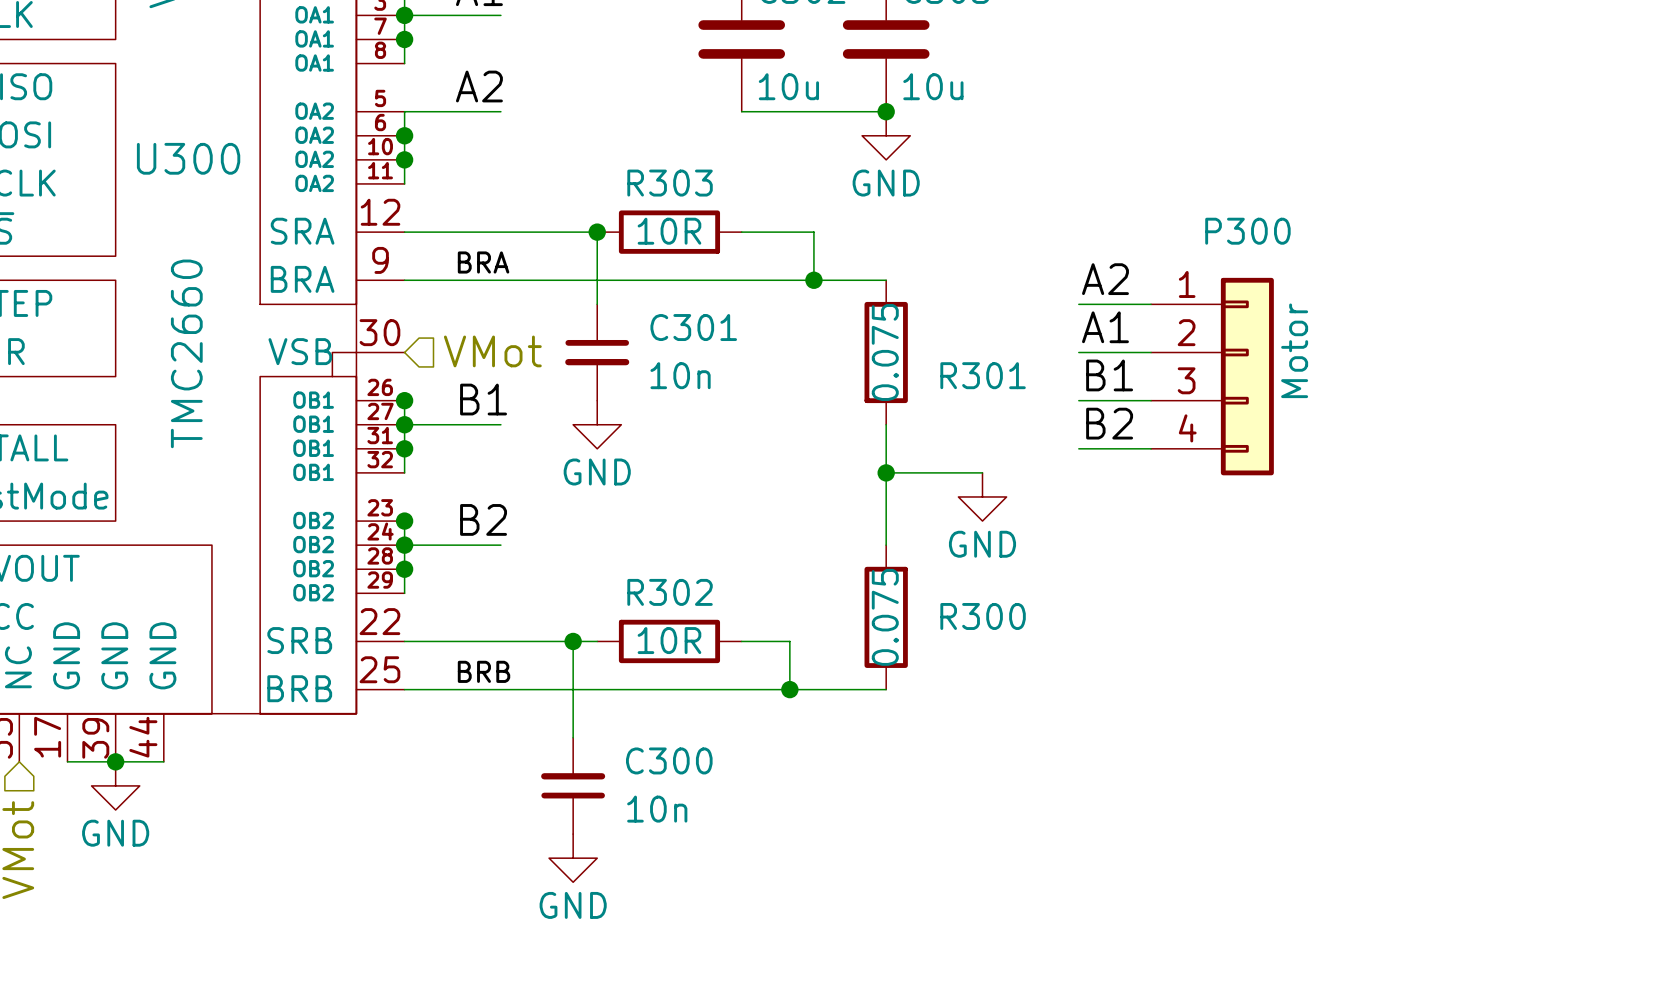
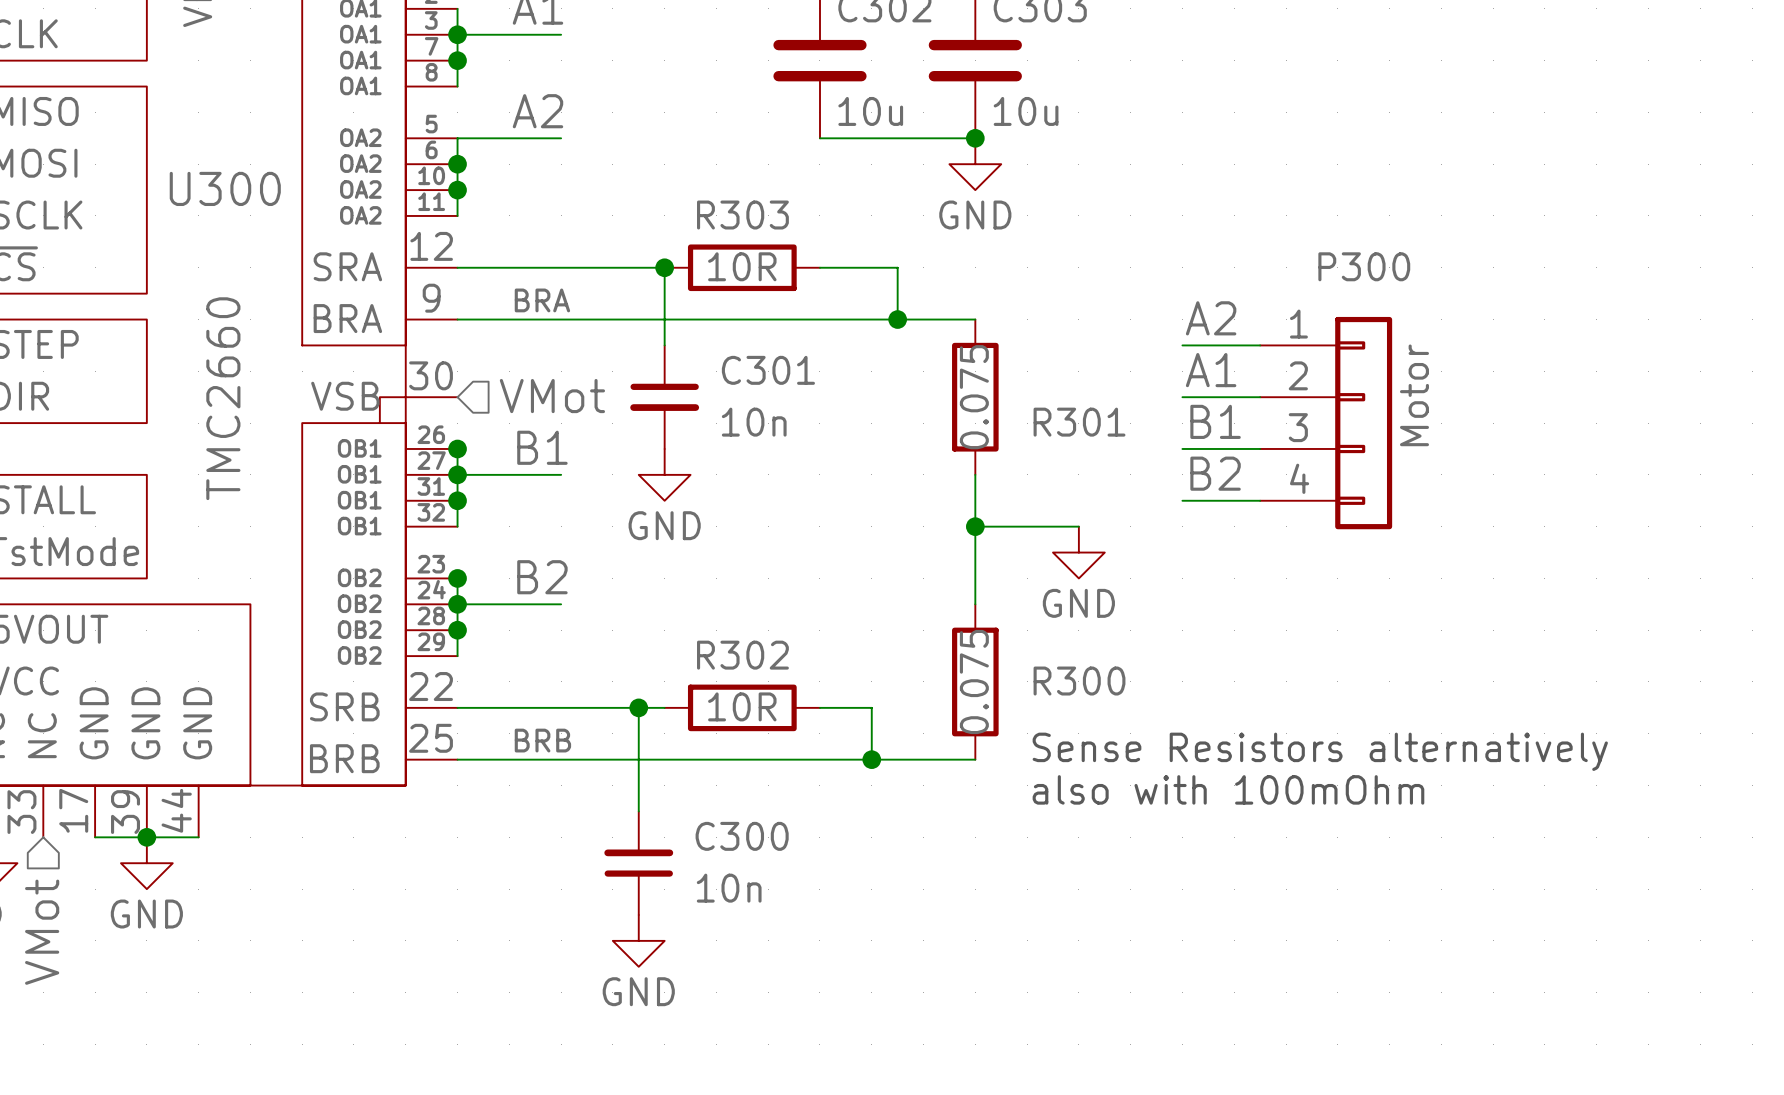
text: none -> Sense Resistors alternatively (1320, 751)
text: none -> also with 100mOhm (1228, 789)

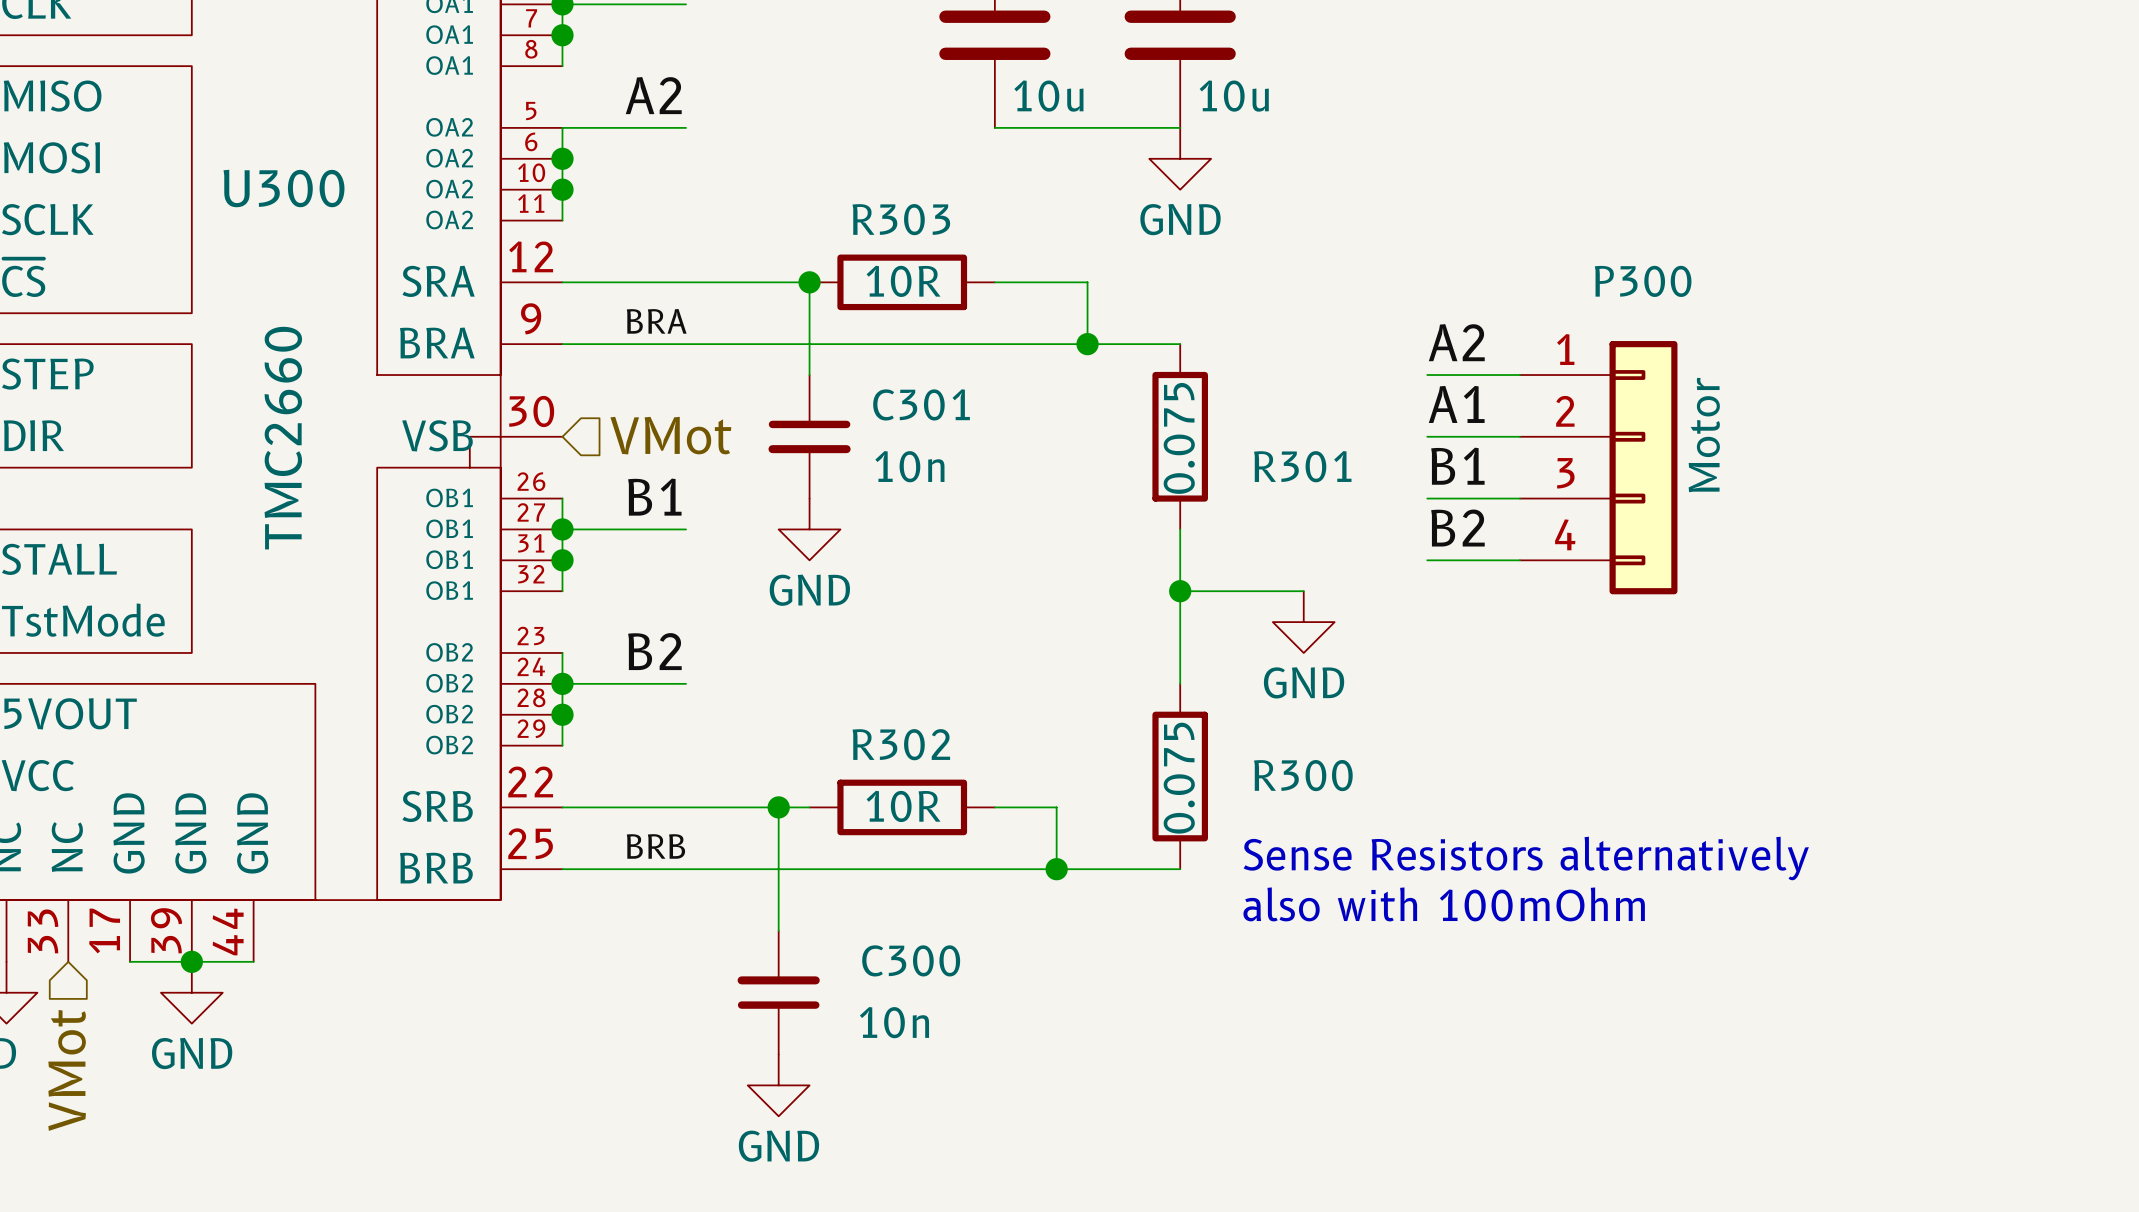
junction: (975, 138) -> none
junction: (457, 448) -> none
junction: (457, 578) -> none

